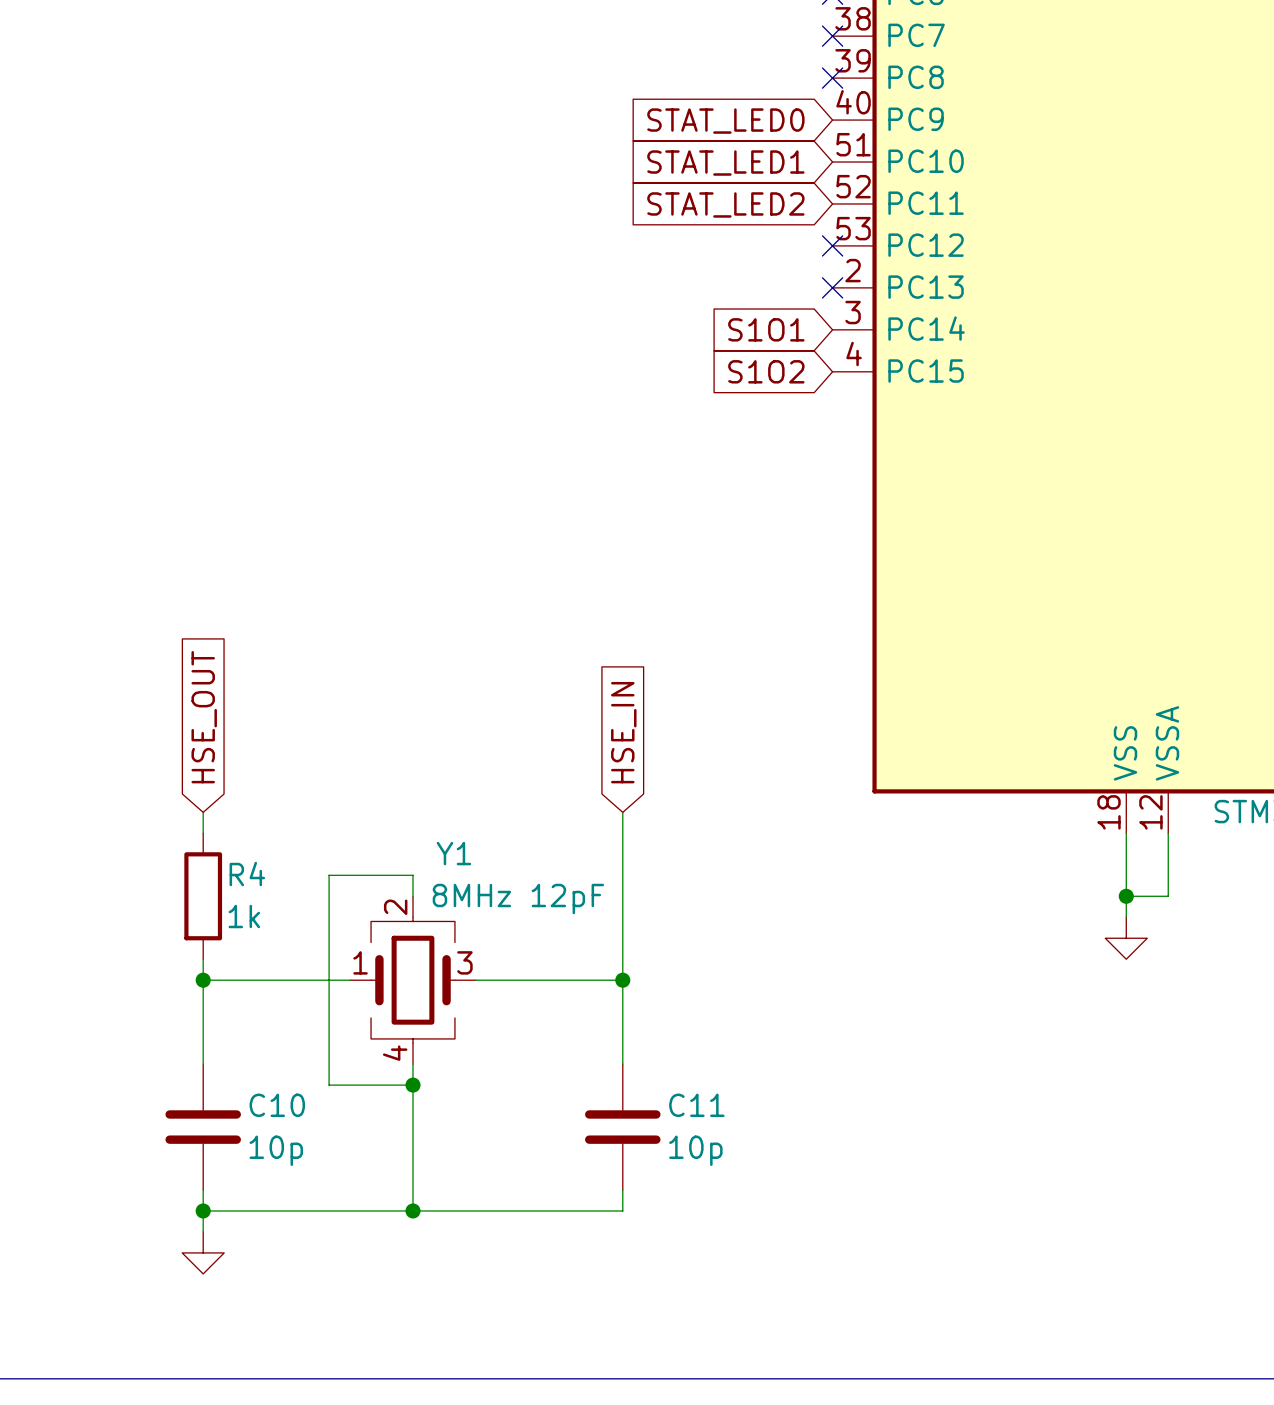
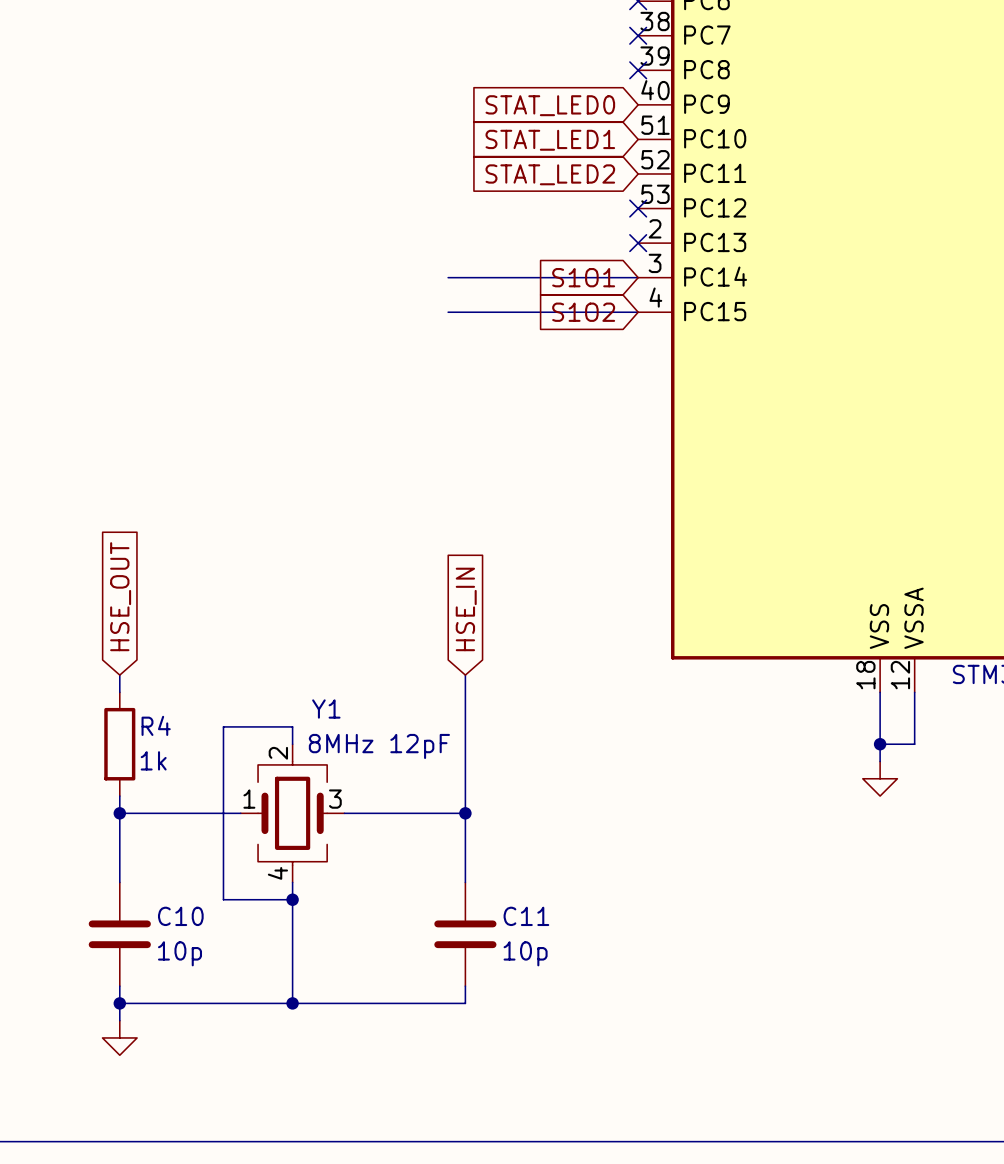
wire: none -> (448, 277) (638, 277)
wire: none -> (448, 312) (638, 312)

